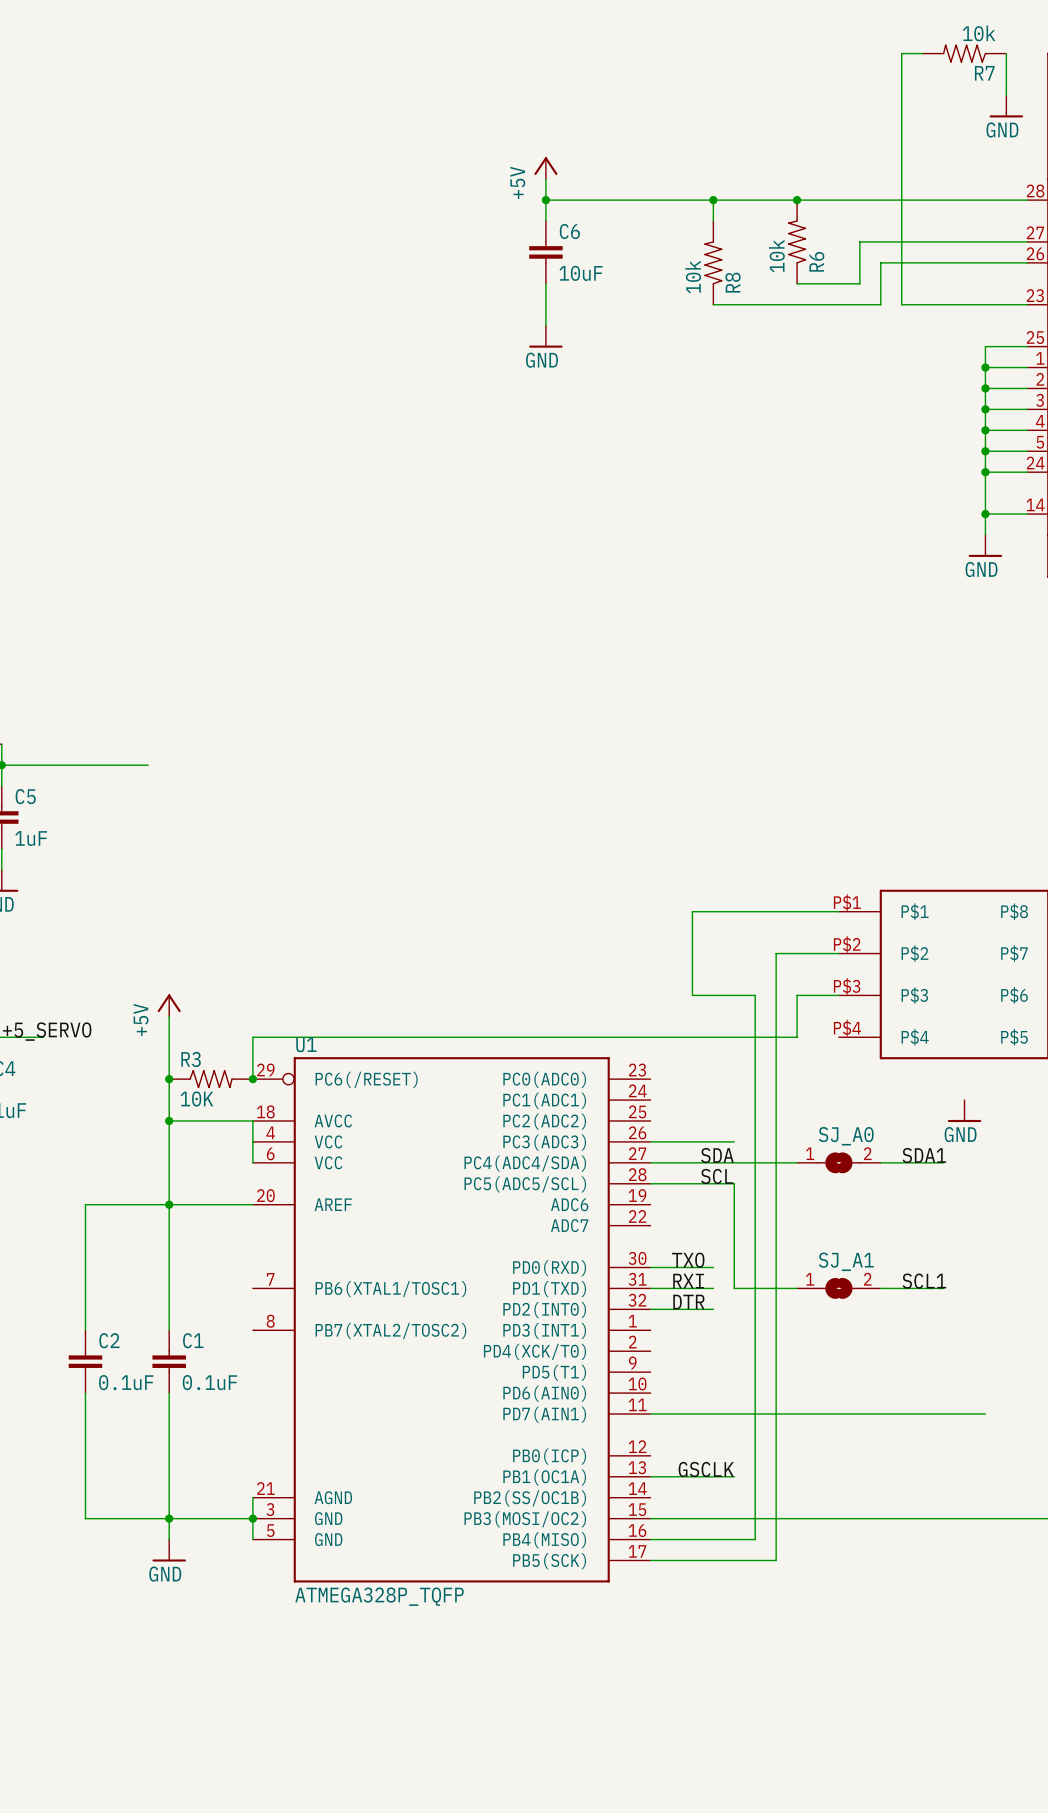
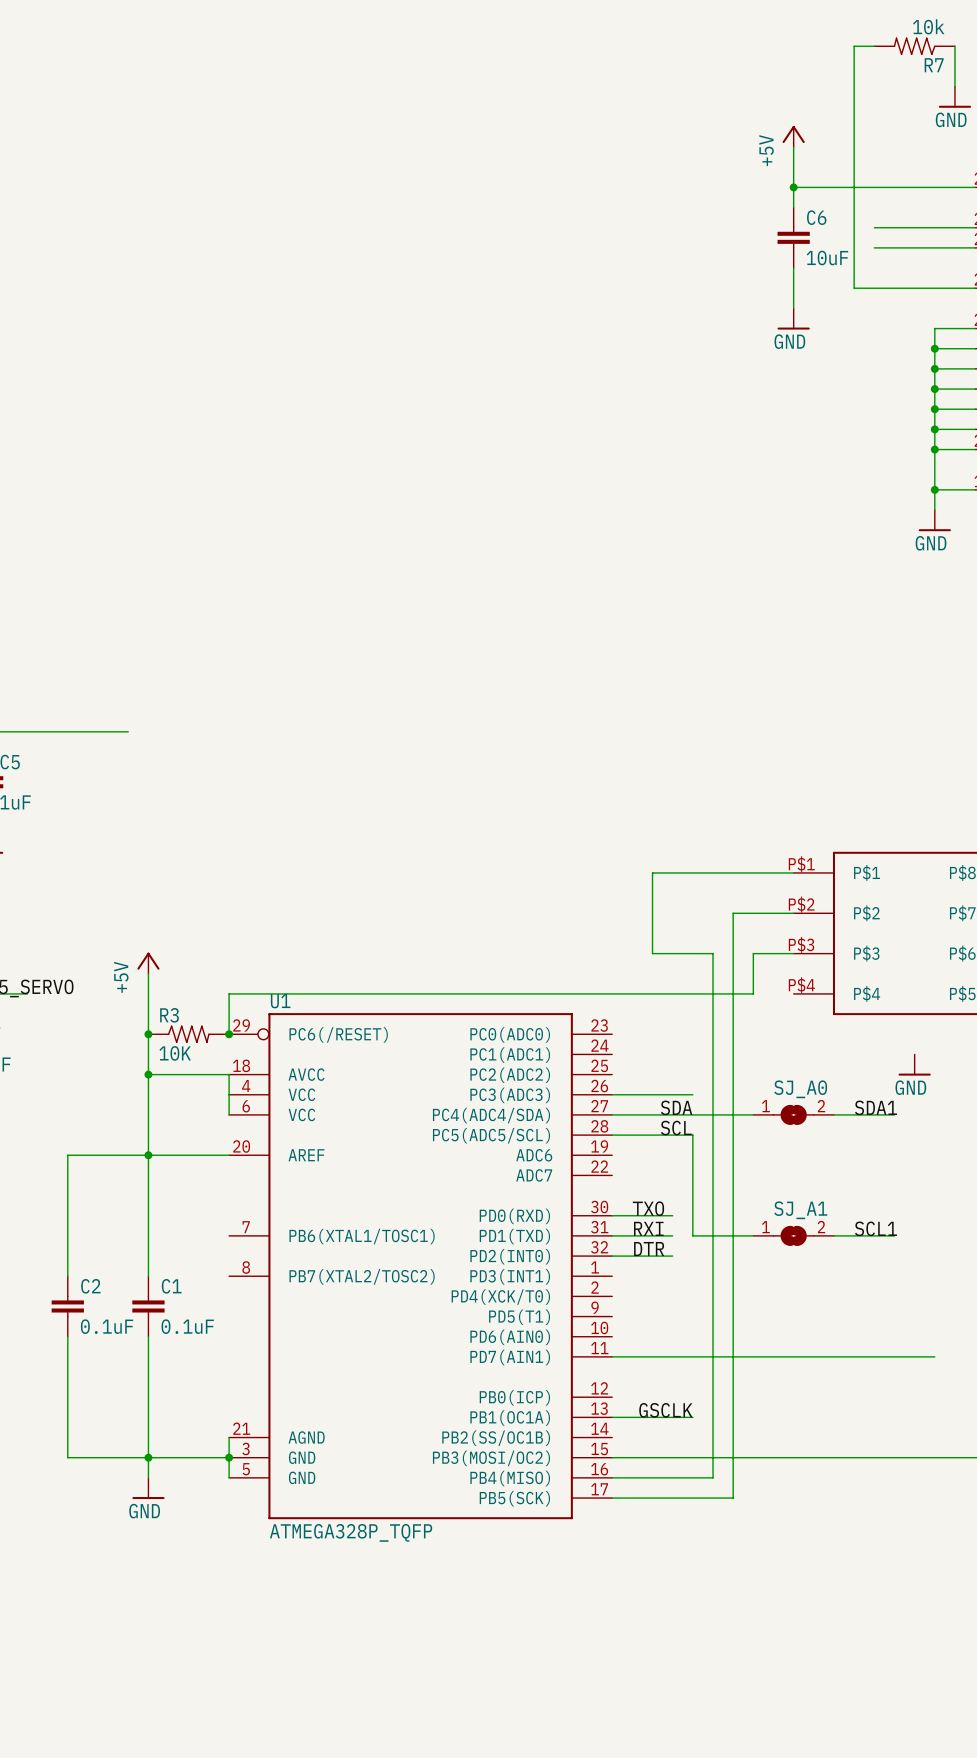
power symbol: none -> +5V (793, 136)
wire: none -> (793, 147) (793, 207)
power symbol: +5V (545, 168) -> none
wire: (545, 179) (545, 221) -> none
wire: (545, 200) (838, 200) -> none
junction: (545, 200) -> none
wire: (713, 200) (713, 221) -> none
junction: (713, 200) -> none
junction position: (797, 200) -> (793, 187)
R6: 10k (797, 241) -> none
wire: (922, 241) (859, 241) (859, 283) (797, 283) -> none
C6 position: (545, 252) -> (793, 237)
R8: 10k (713, 262) -> none
wire: (922, 262) (880, 262) (880, 304) (713, 304) -> none
wire: (545, 283) (545, 325) -> none
wire: none -> (793, 268) (793, 308)
power symbol: GND (545, 336) -> none
power symbol: none -> GND (793, 318)

